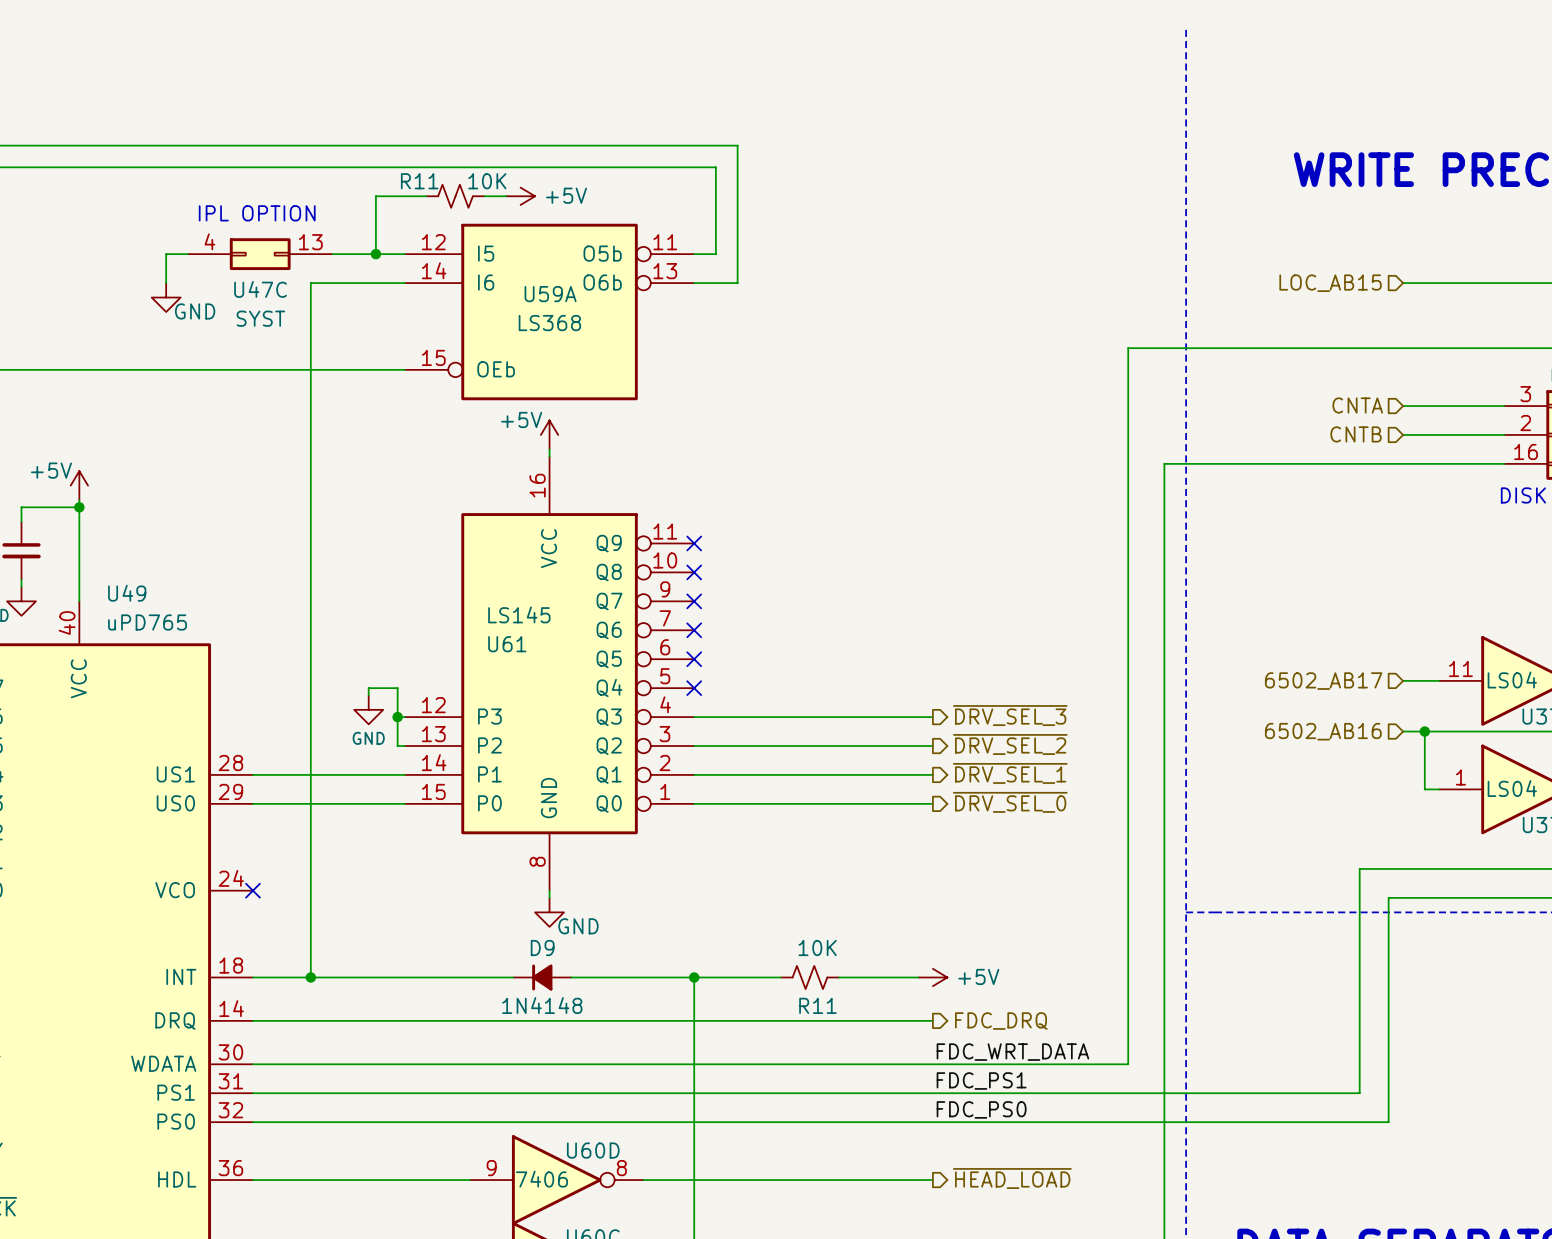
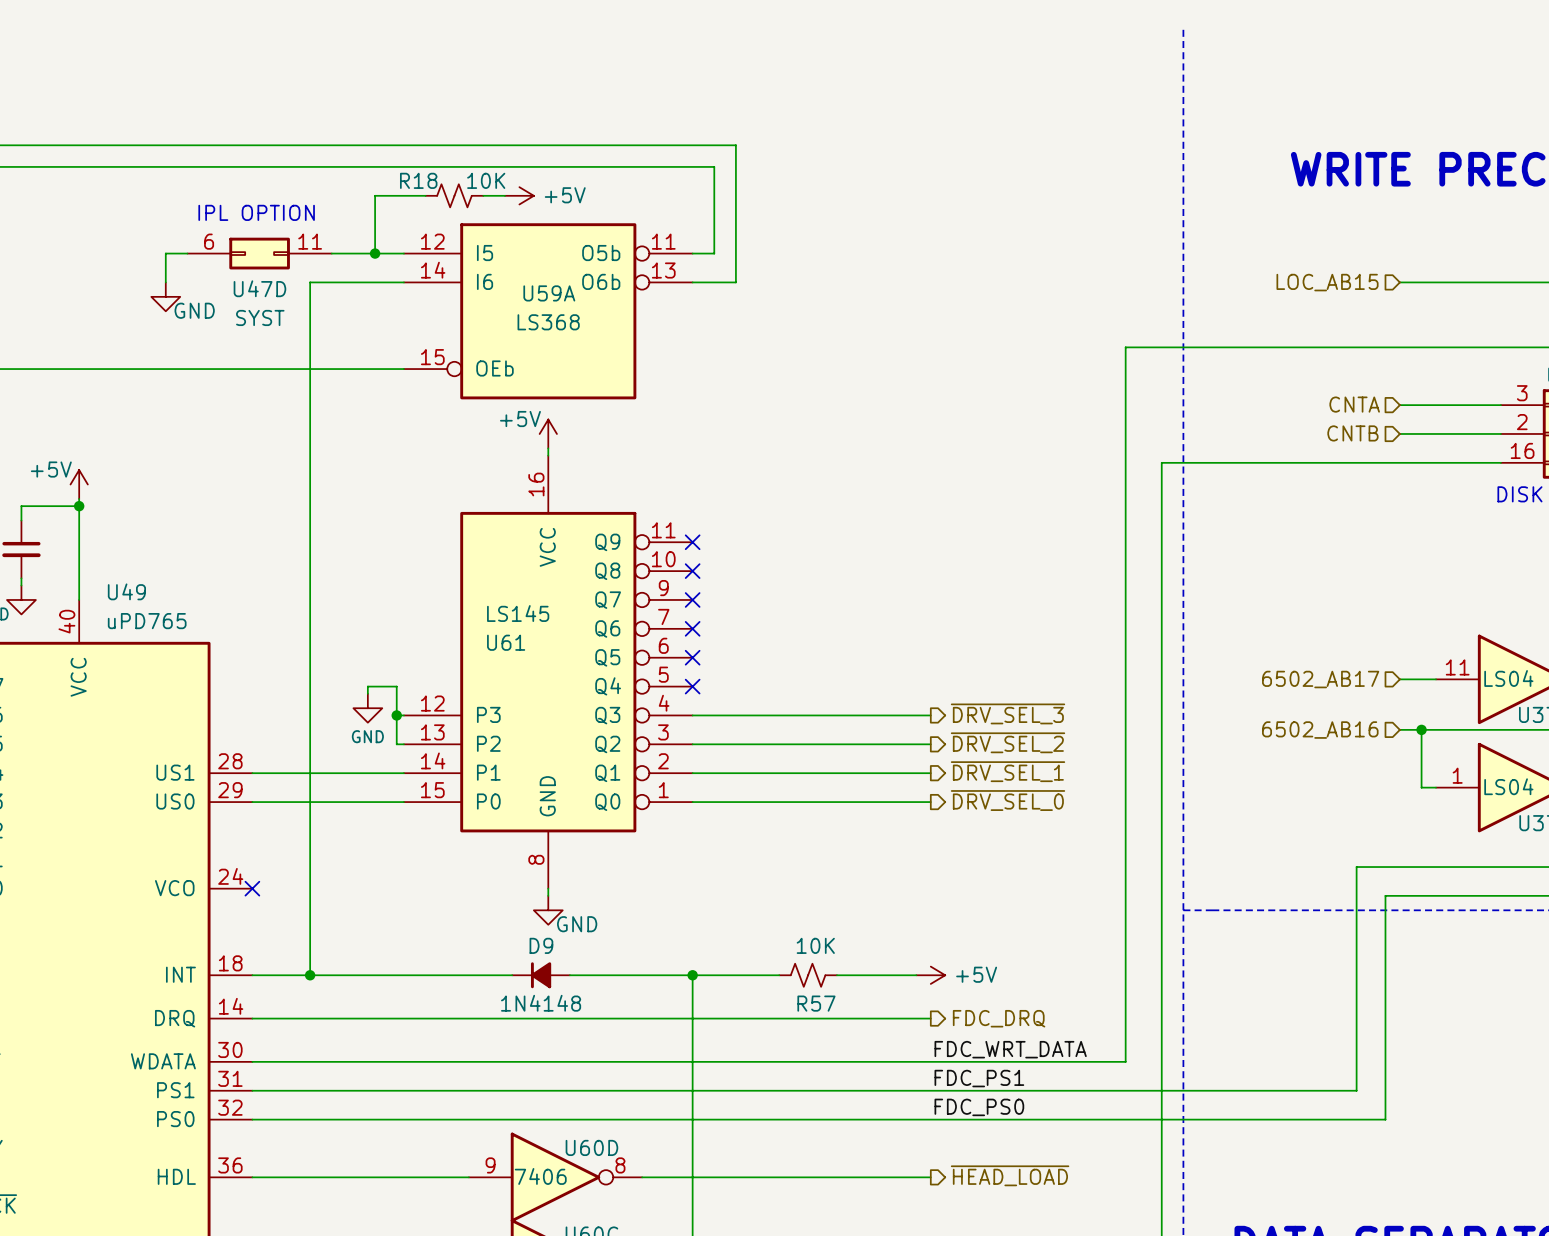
R11 name: R11 (419, 181) -> R18 (418, 180)
U47C pin number: 4 (209, 241) -> 6 (209, 241)
U47C pin number: 13 (310, 242) -> 11 (310, 241)
U47C name: U47C (260, 289) -> U47D (259, 288)
R11 name: R11 (817, 1005) -> R57 (816, 1003)

